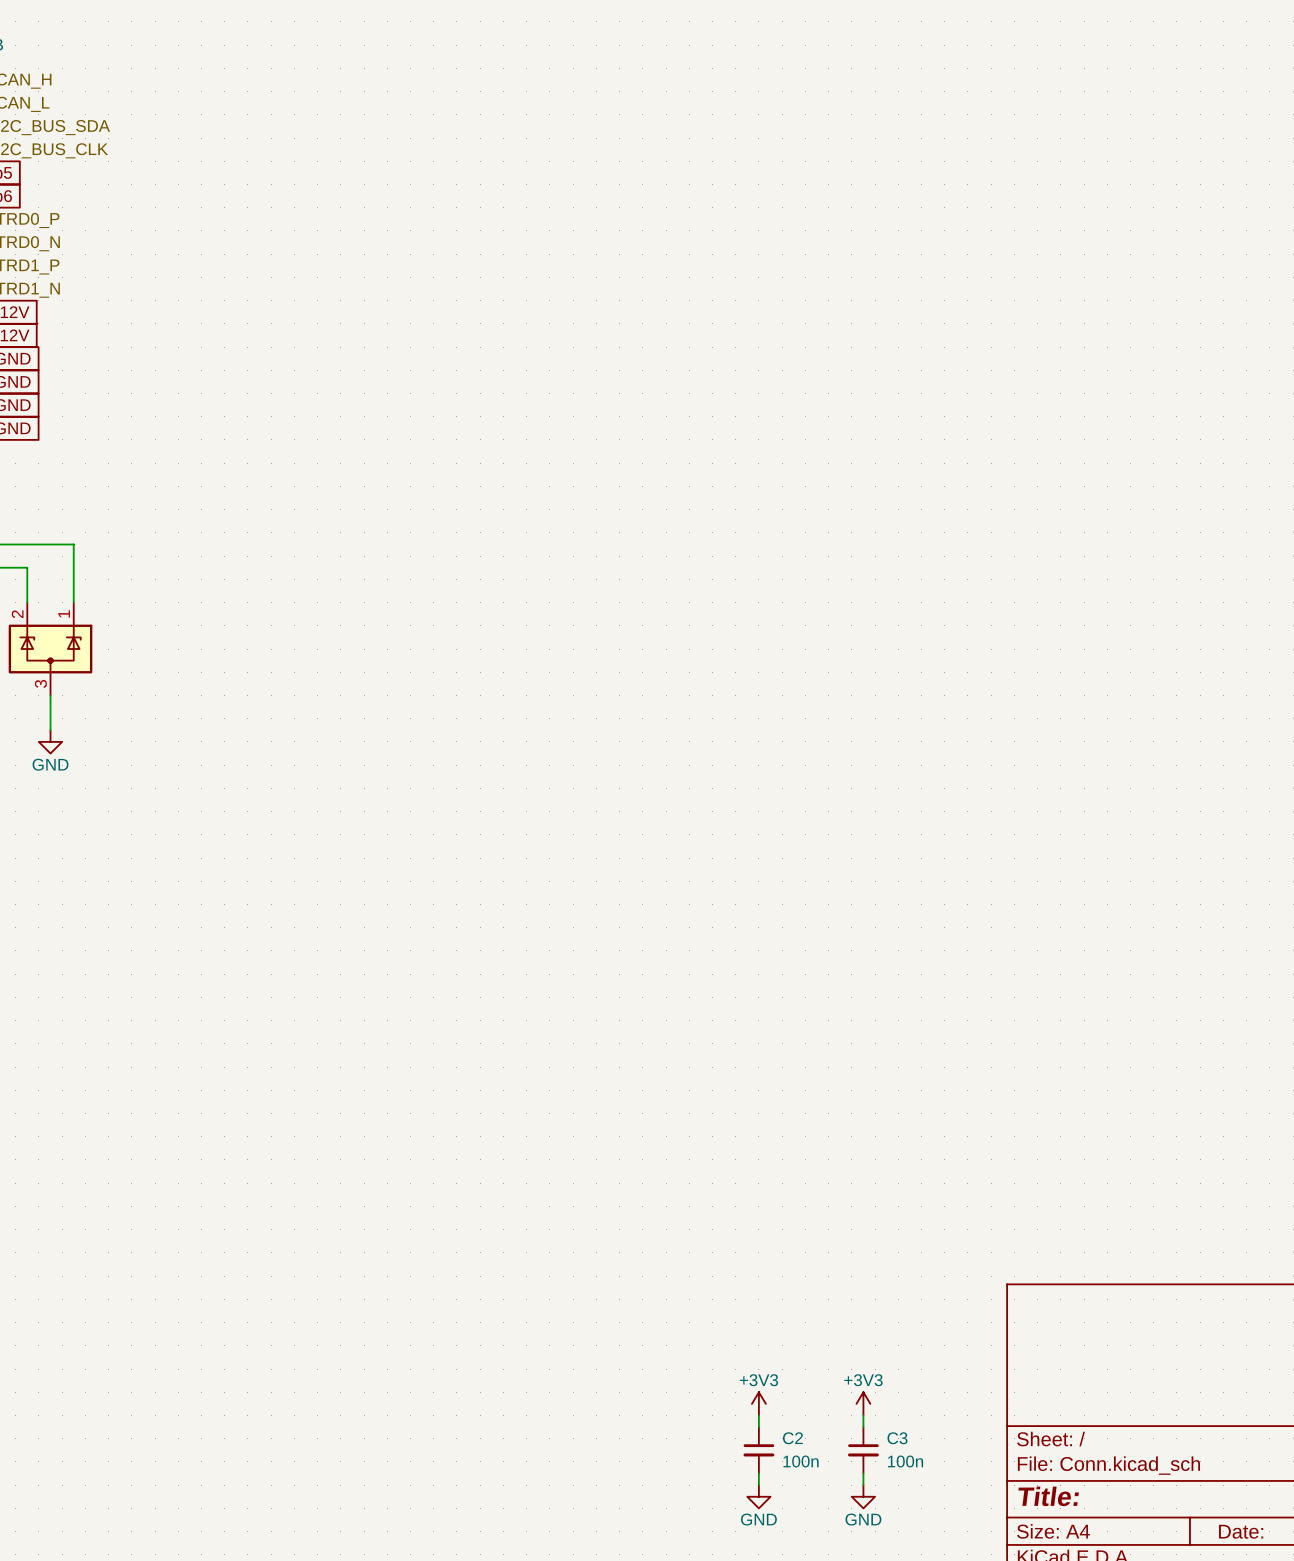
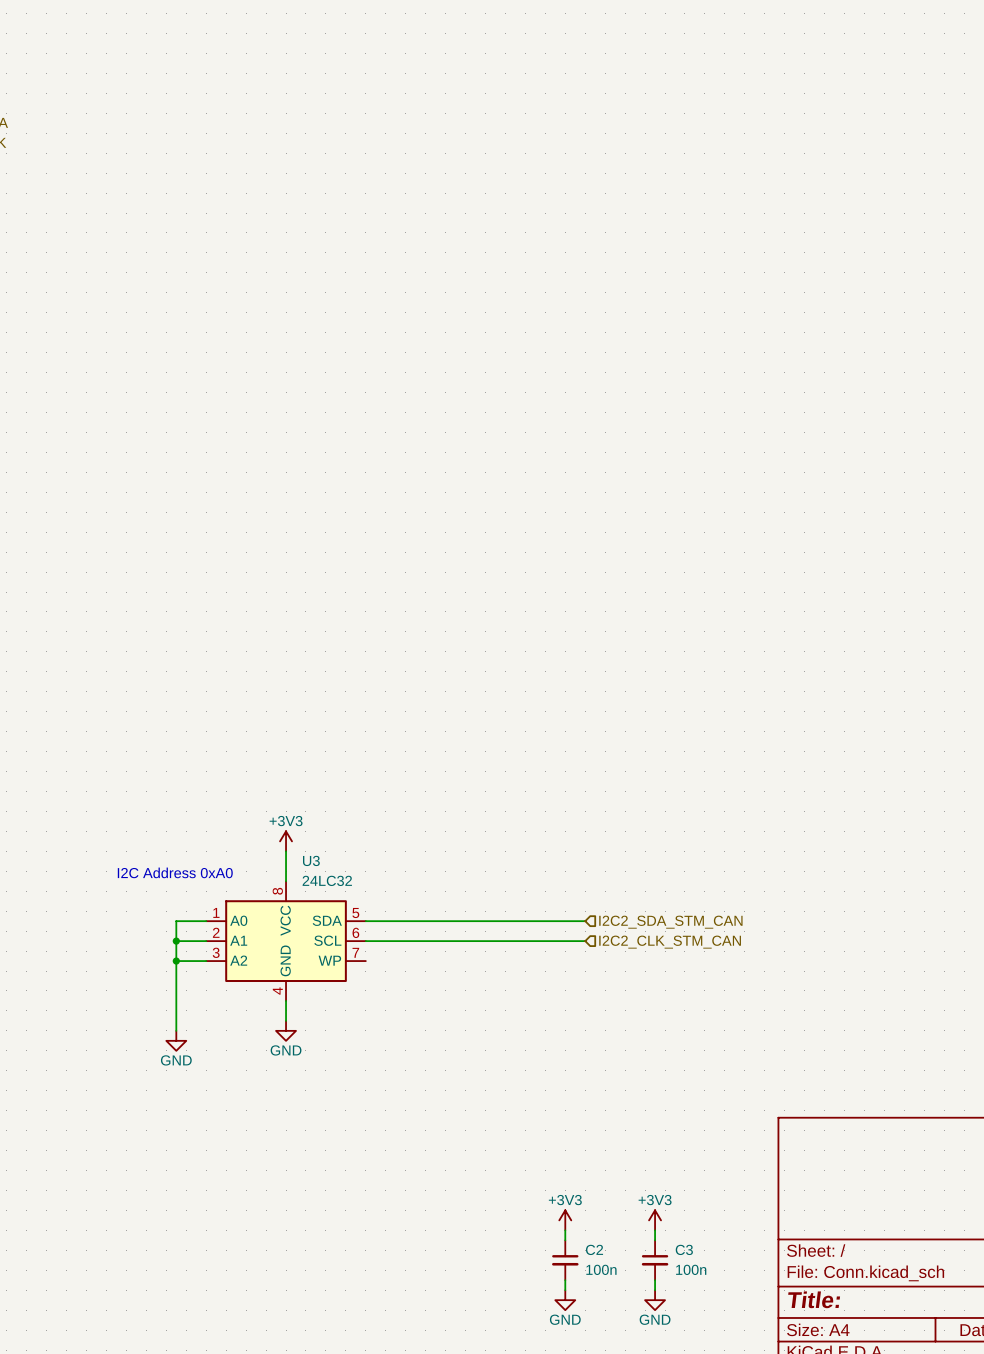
power symbol: none -> +3V3 (286, 841)
wire: none -> (286, 851) (286, 881)
text: none -> I2C Address 0xA0 (175, 872)
wire: none -> (206, 921) (176, 921) (176, 1030)
wire: none -> (365, 921) (585, 921)
hierarchical label: none -> I2C2_SDA_STM_CAN (670, 922)
wire: none -> (176, 941) (206, 941)
junction: none -> (176, 941)
U3: none -> 24LC32 (286, 941)
wire: none -> (365, 941) (585, 941)
hierarchical label: none -> I2C2_CLK_STM_CAN (670, 942)
wire: none -> (176, 961) (206, 961)
junction: none -> (176, 961)
wire: none -> (286, 1000) (286, 1020)
power symbol: none -> GND (286, 1030)
power symbol: none -> GND (176, 1040)

